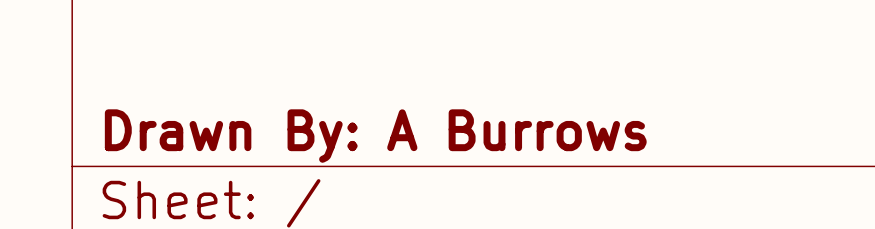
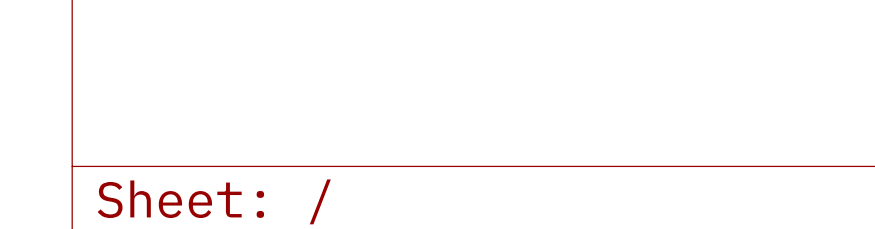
title block: Drawn By: A Burrows (375, 136) -> none

